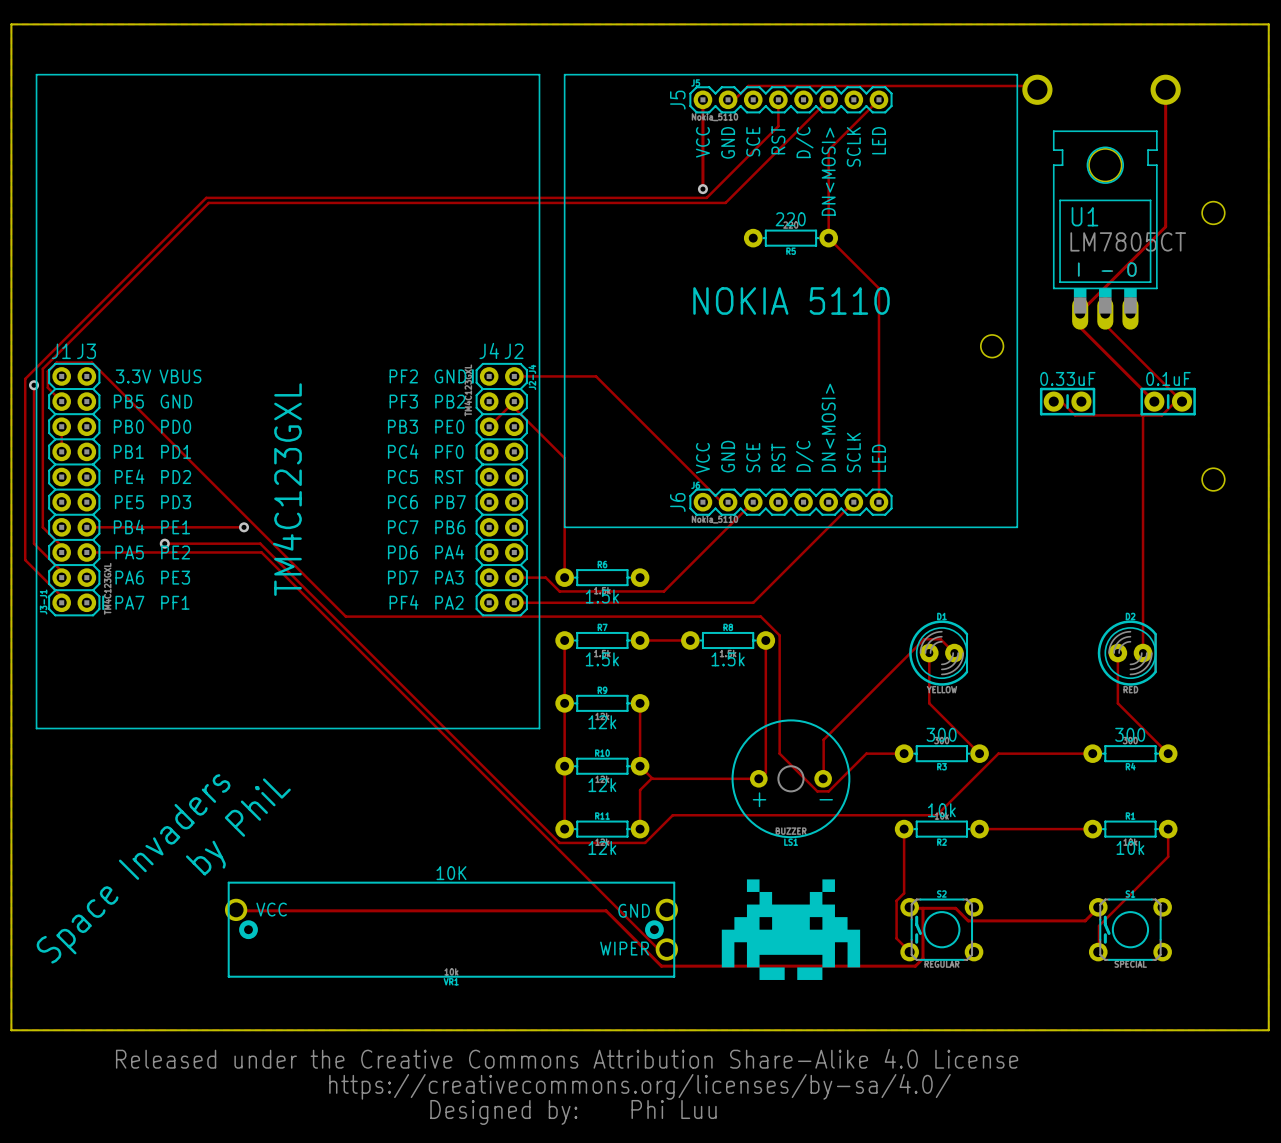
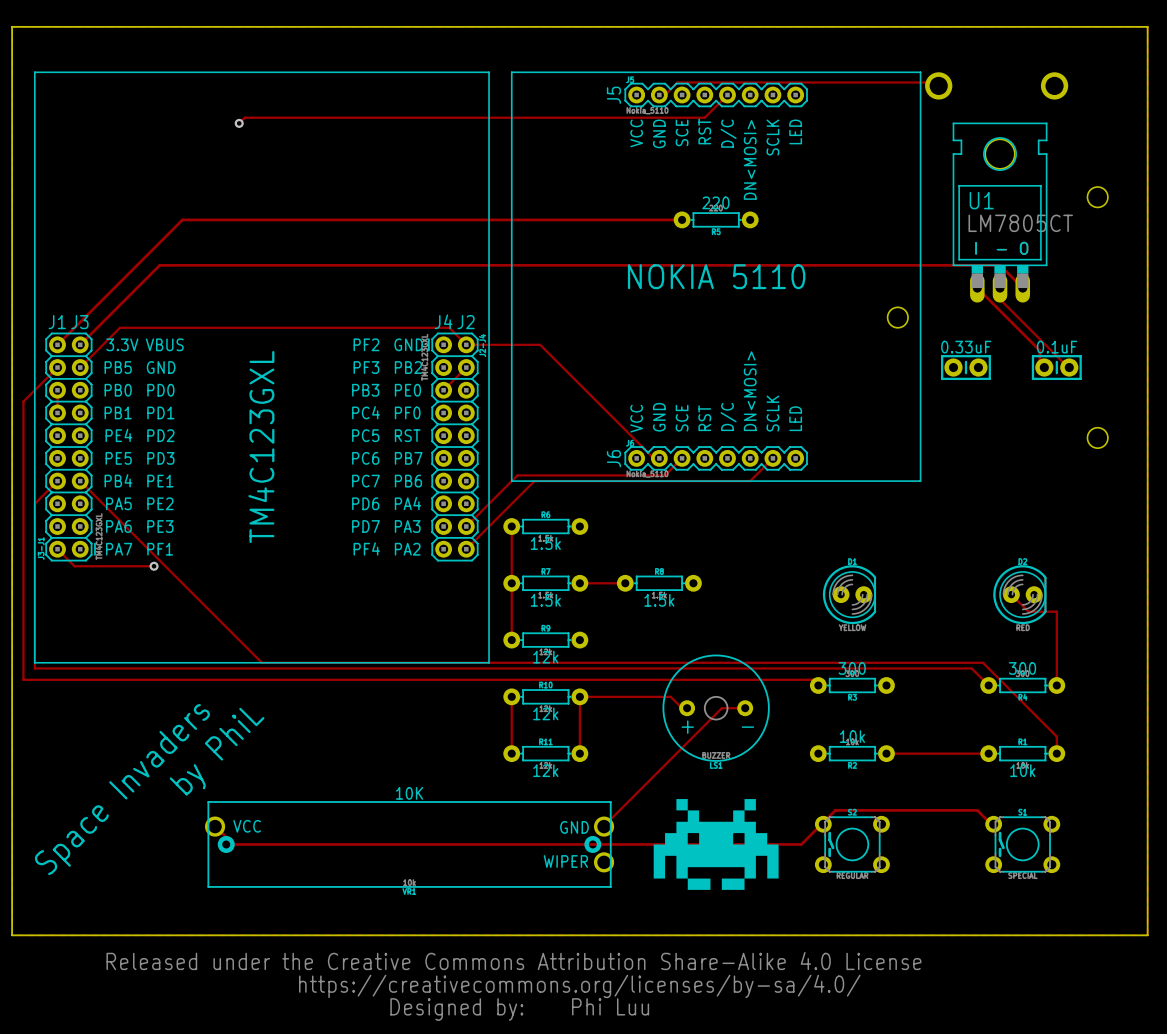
track: (1165, 89) (1165, 226) (1080, 312) (1080, 327) (1154, 401) -> (977, 288) (1039, 350) (1039, 367) (1044, 367)
track: (702, 99) (702, 189) -> none
track: (778, 99) (778, 126) (706, 197) (206, 197) (25, 378) (25, 560) (61, 596) (61, 602) -> (154, 566) (74, 566) (57, 549)
track: none -> (727, 95) (704, 117) (244, 117) (239, 123)
track: (828, 99) (725, 202) (208, 202) (42, 368) (42, 527) (61, 546) (61, 552) -> none
track: (878, 99) (828, 150) (828, 238) (878, 288) (878, 502) -> none
via: none -> (239, 123)
via: (702, 189) -> none
track: none -> (682, 219) (182, 219) (57, 344)
track: none -> (1022, 288) (1000, 265) (159, 265) (80, 344)
track: (1105, 324) (1182, 401) (1178, 399) (1161, 415) (1075, 415) (1061, 401) (1053, 401) -> (1000, 298) (1069, 367)
track: none -> (466, 344) (449, 327) (119, 327) (80, 367)
track: (34, 385) (34, 543) (61, 571) (61, 577) -> none
via: (34, 385) -> none
track: (61, 401) (47, 387) (47, 371) (56, 362) (91, 362) (345, 616) (760, 616) (779, 635) (779, 753) (817, 791) (828, 791) (866, 753) (904, 753) -> (57, 367) (23, 401) (23, 679) (812, 679) (818, 685)
track: (514, 401) (511, 405) (564, 458) (564, 577) -> (511, 583) (511, 526)
track: (1143, 415) (1143, 653) -> none
track: (734, 521) (663, 591) (559, 591) (545, 577) (514, 577) -> (665, 475) (517, 475) (466, 526)
track: (86, 527) (244, 527) -> (80, 481) (261, 662) (983, 662) (1056, 736) (1056, 753)
via: (244, 527) -> none
track: (828, 527) (753, 602) (514, 602) -> (750, 481) (534, 481) (466, 549)
track: (164, 543) (260, 543) (559, 842) (645, 842) (672, 815) (936, 815) (998, 753) (1092, 753) -> (57, 481) (34, 503) (34, 668) (971, 668) (988, 685)
via: (164, 543) -> none
track: (86, 552) (261, 552) (657, 948) (666, 949) -> none
via: none -> (154, 566)
track: (765, 640) (765, 772) (758, 778) -> none
track: (929, 653) (929, 703) (979, 753) -> none
track: (954, 653) (940, 639) (924, 639) (823, 739) (823, 778) -> (604, 826) (721, 708) (745, 708)
track: (1117, 653) (1117, 703) (1168, 753) -> (1011, 594) (1028, 611) (1056, 611) (1056, 685)
track: (564, 703) (564, 766) -> none
track: (640, 703) (640, 766) (652, 778) (753, 778) -> (579, 718) (579, 696) (670, 696) (682, 708)
track: (652, 778) (640, 790) -> none
track: (904, 829) (904, 893) (896, 900) (896, 938) (909, 952) -> none
track: (1168, 829) (1168, 856) (1099, 925) (1098, 952) -> none
track: (909, 907) (955, 908) (968, 920) (1085, 920) (1098, 907) -> none
track: (922, 908) (922, 958) (915, 966) (661, 966) (606, 910) (236, 909) -> (993, 824) (977, 810) (835, 810) (801, 844) (233, 844) (215, 826)

